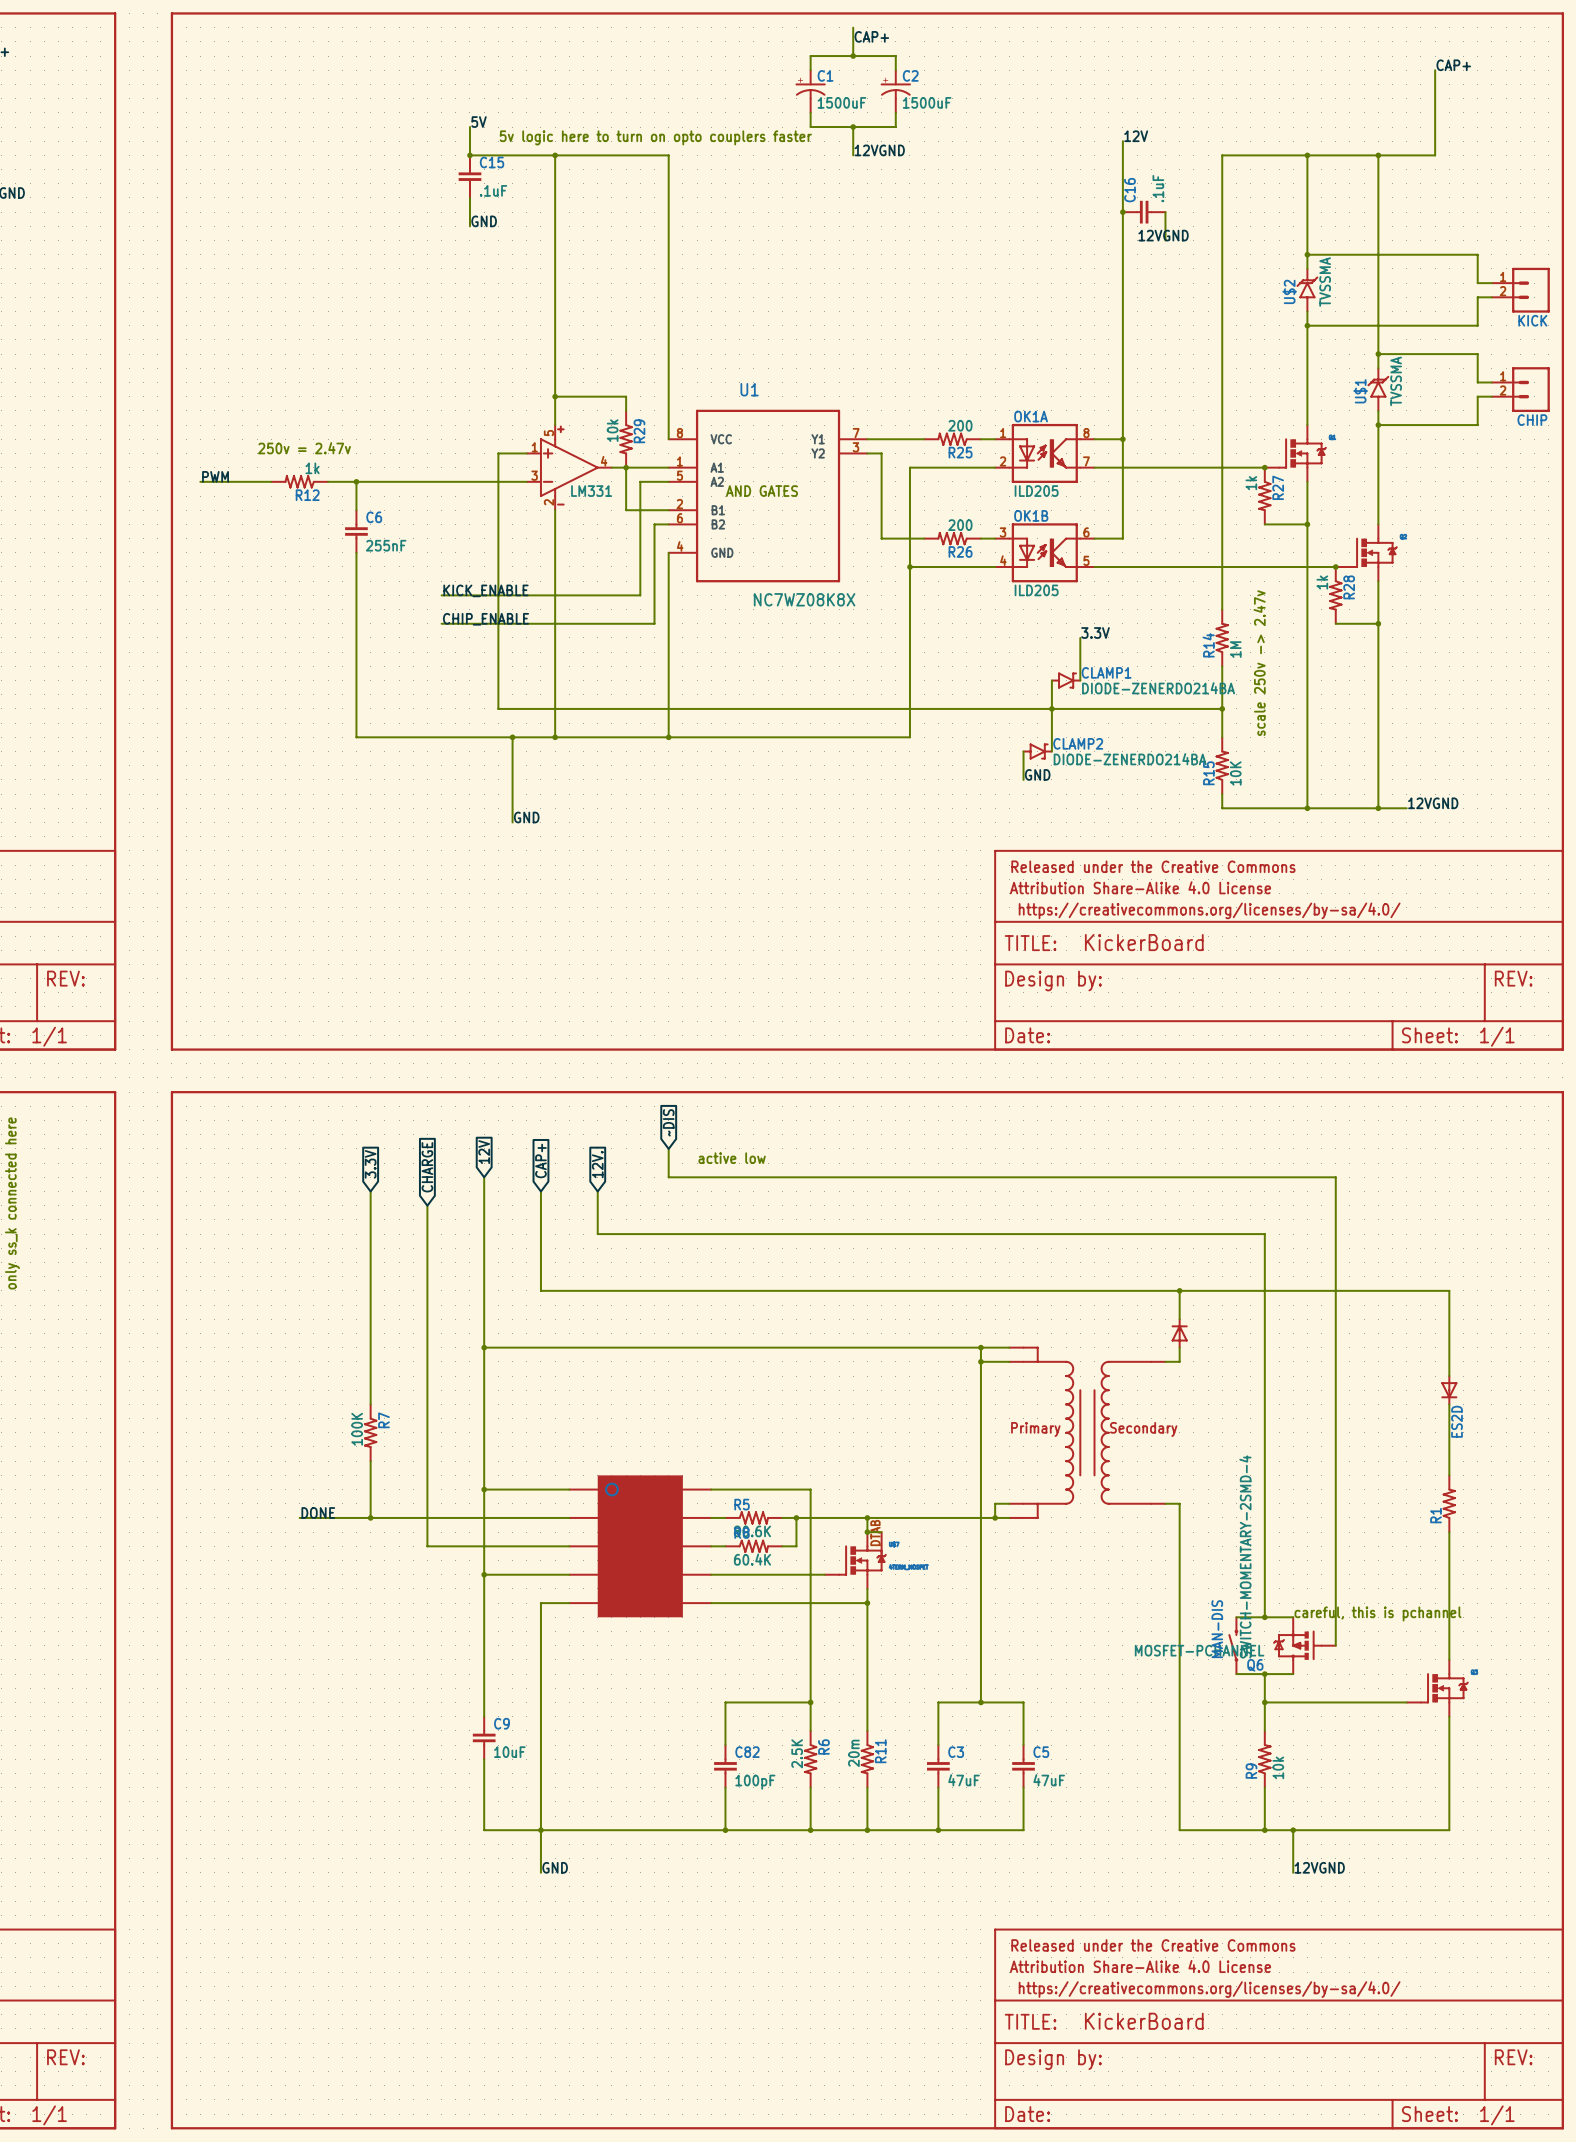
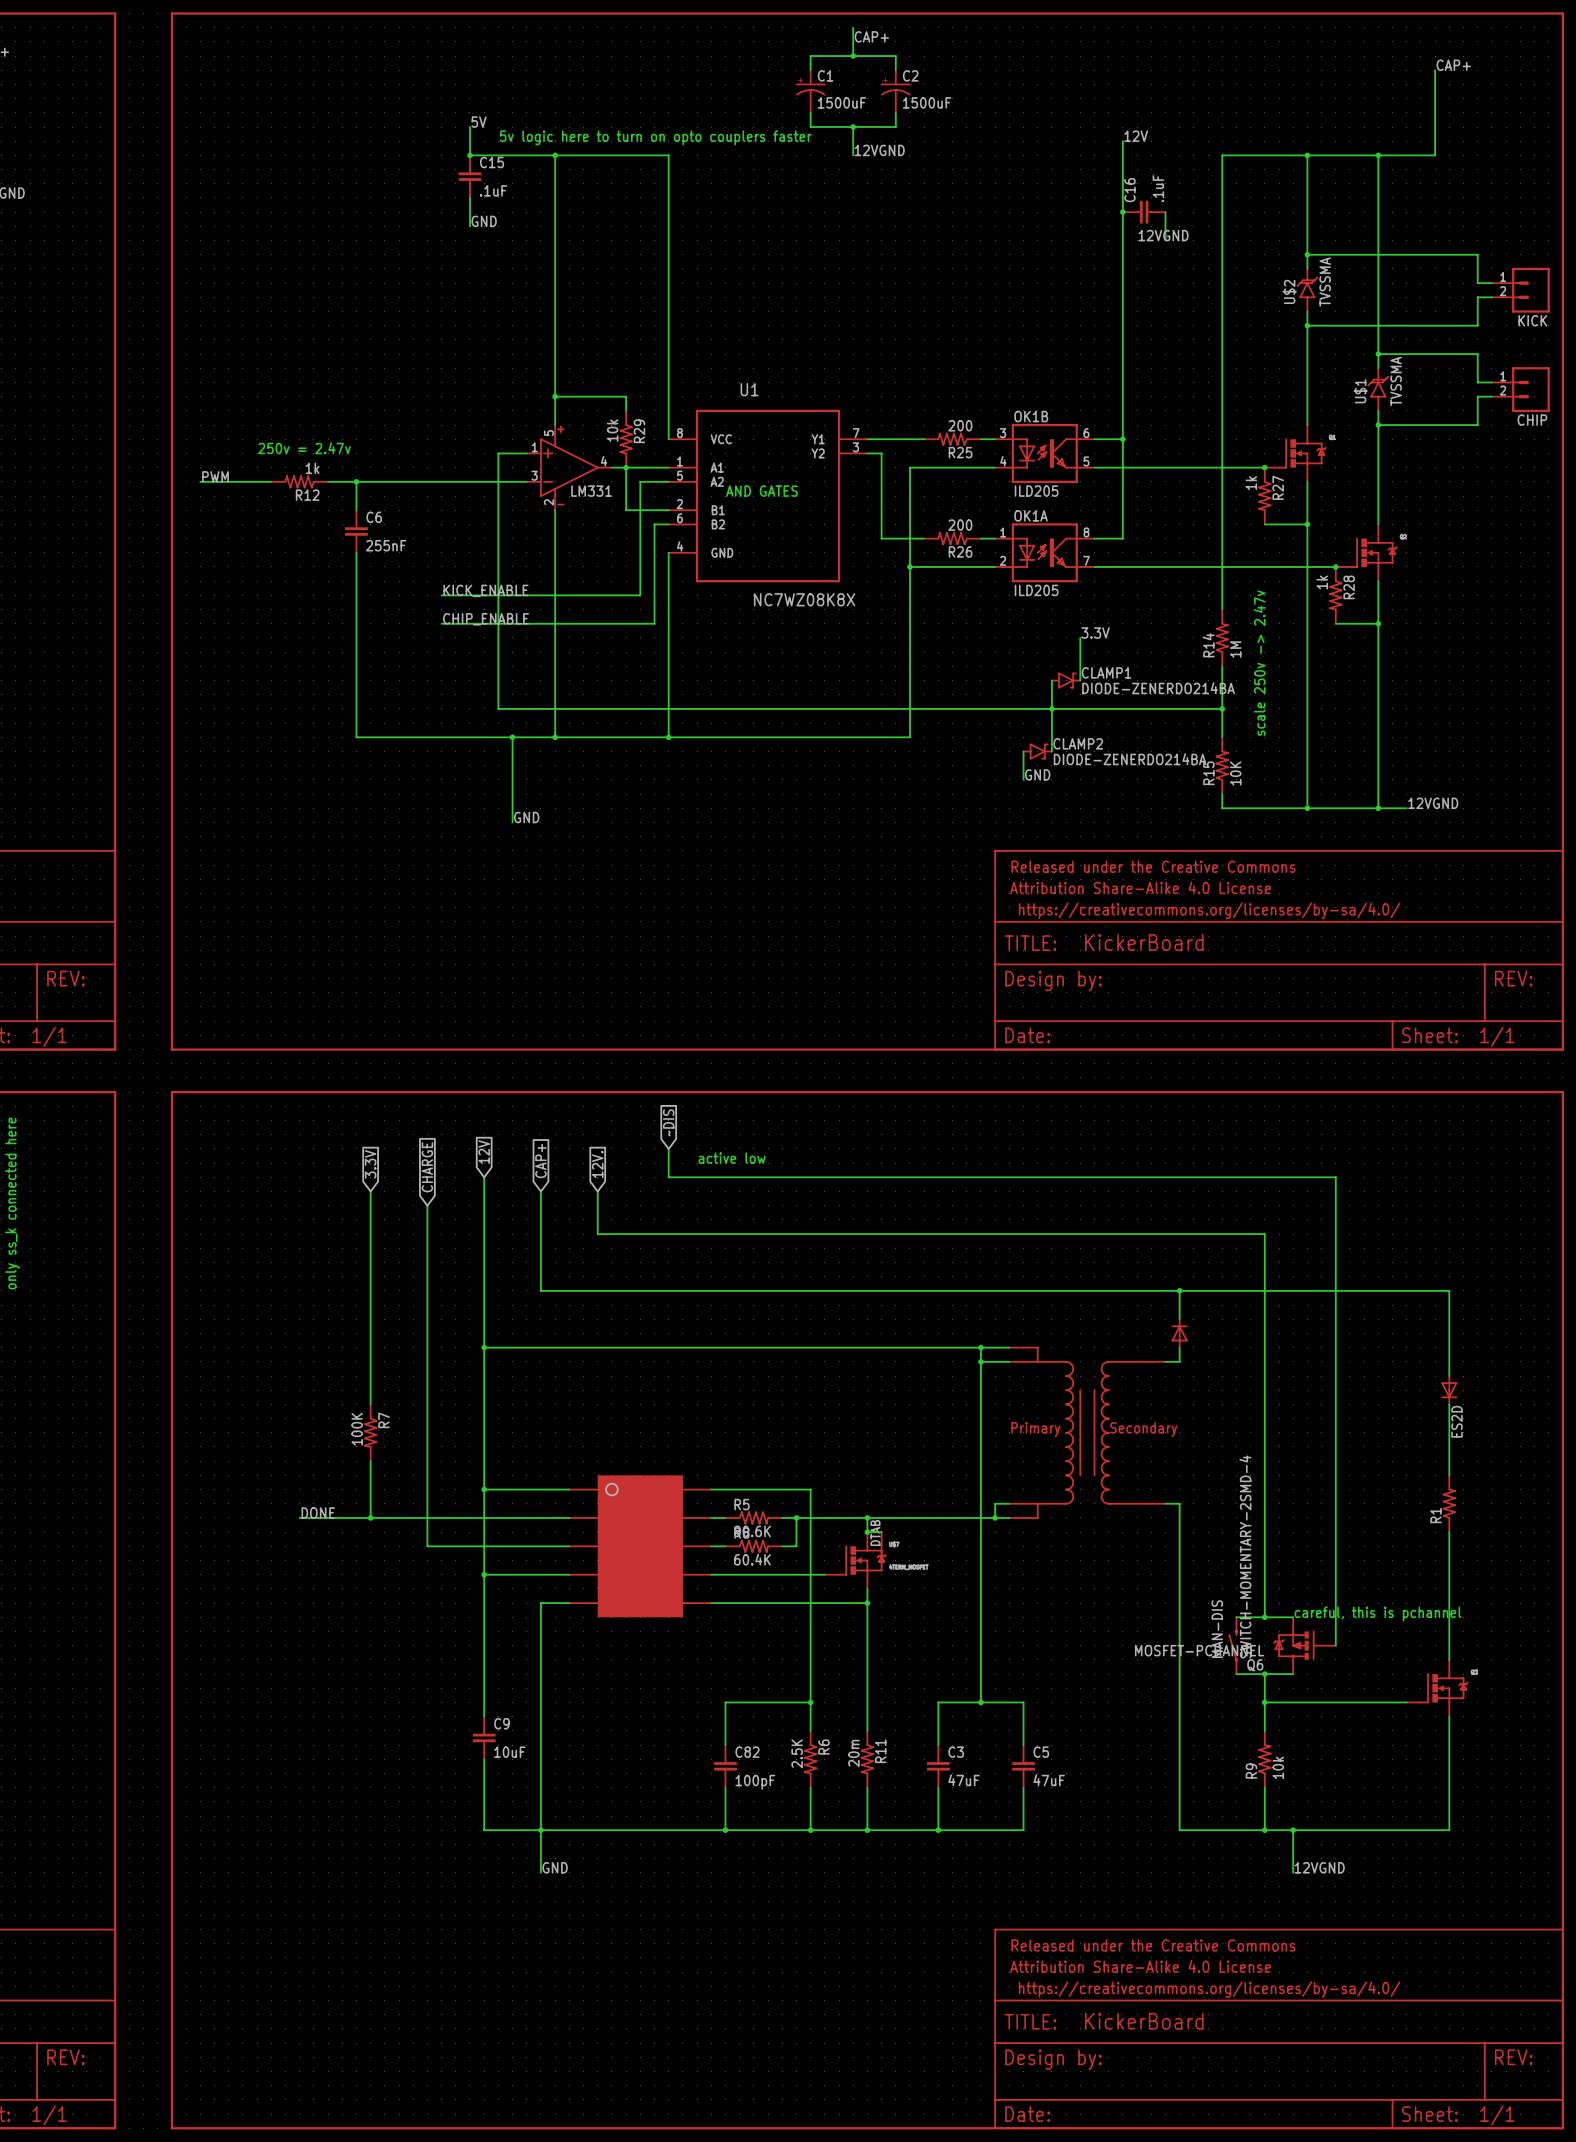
OK1A position: (1044, 453) -> (1044, 552)
OK1B position: (1044, 552) -> (1044, 453)

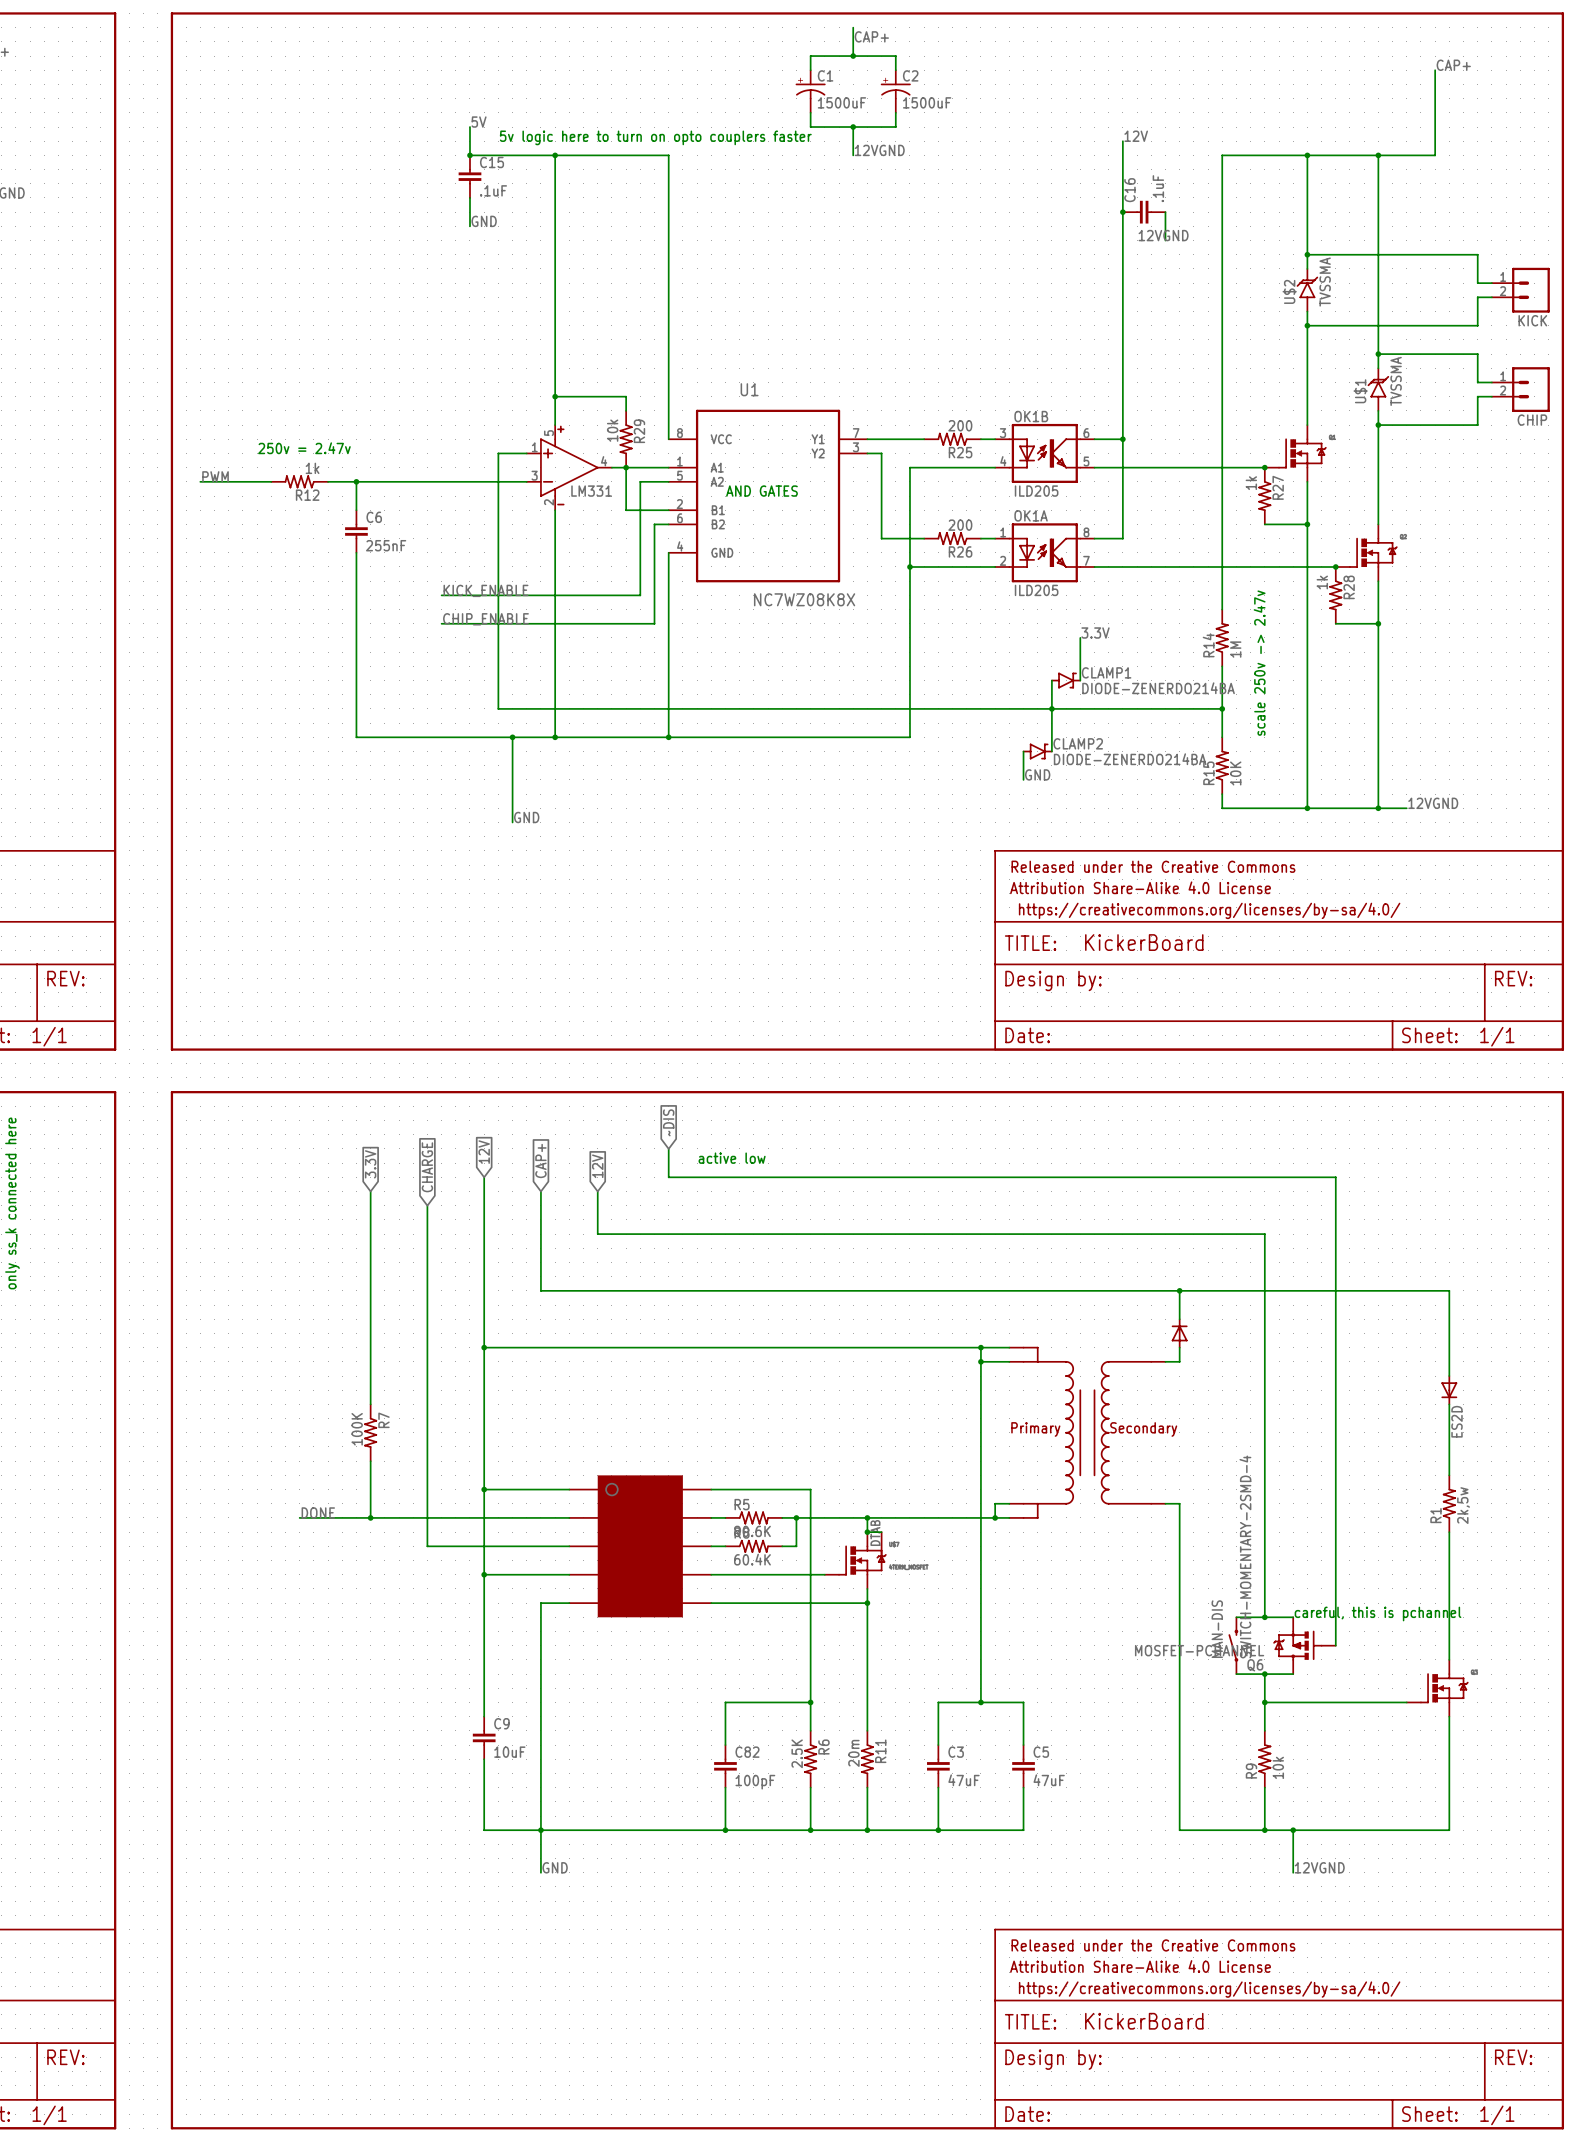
global label: 12V. (597, 1164) -> 12V (597, 1166)
R1 value: none -> 2k,5w (1463, 1505)

